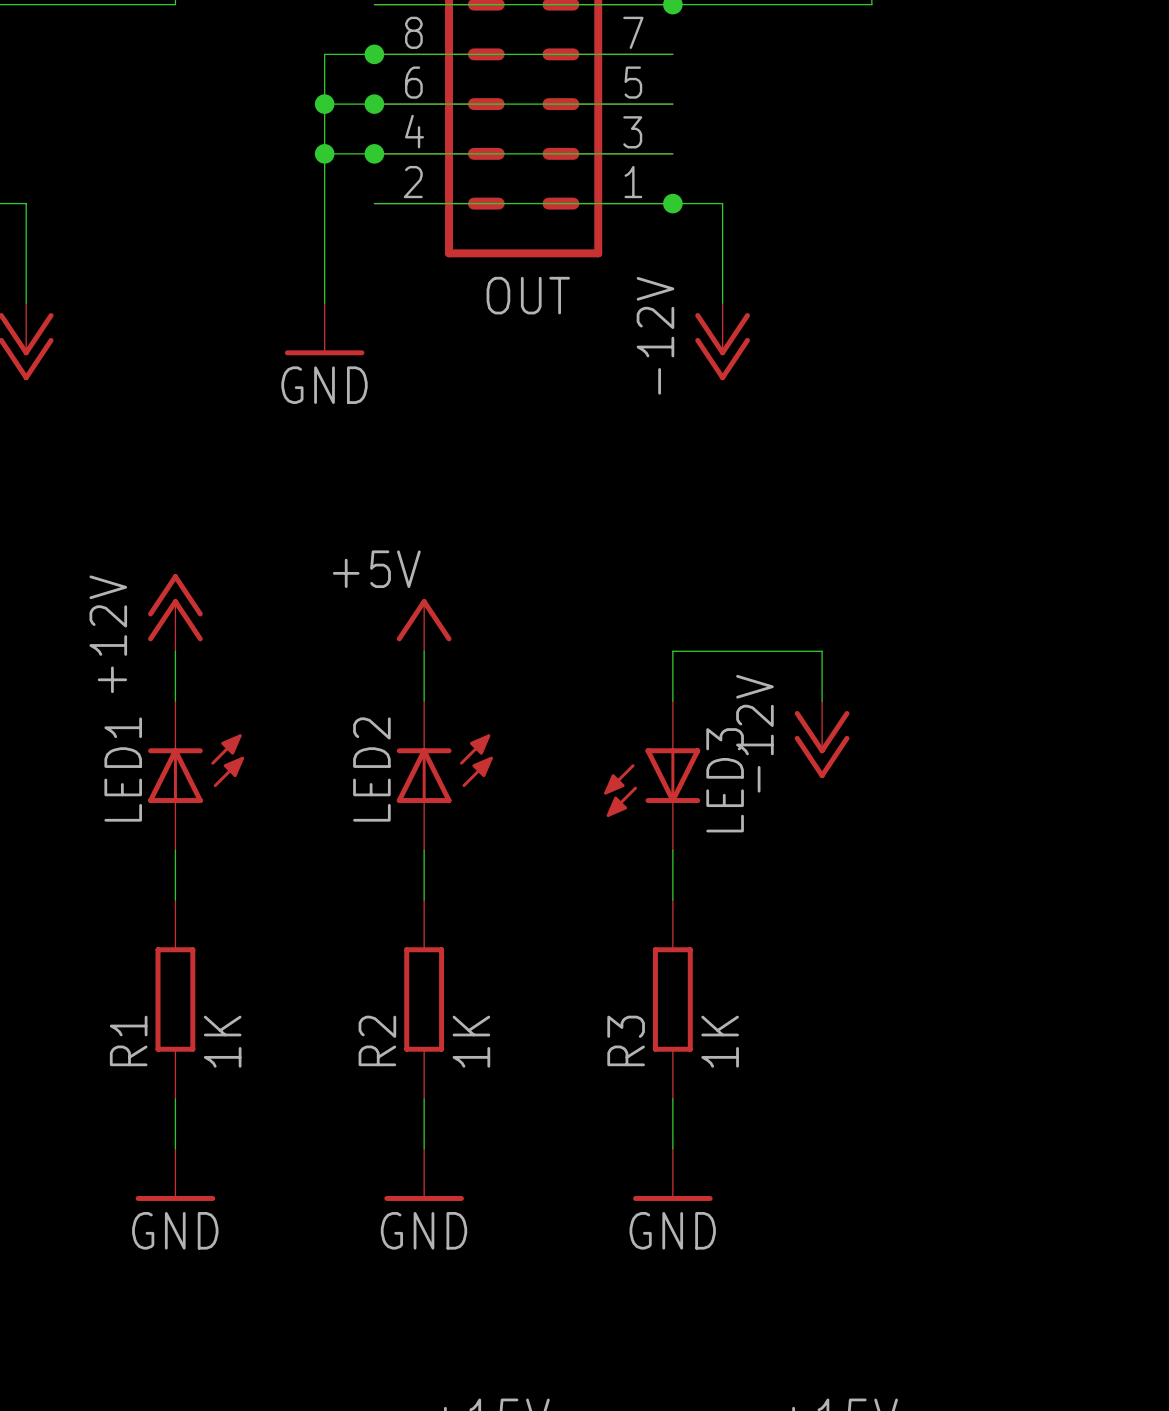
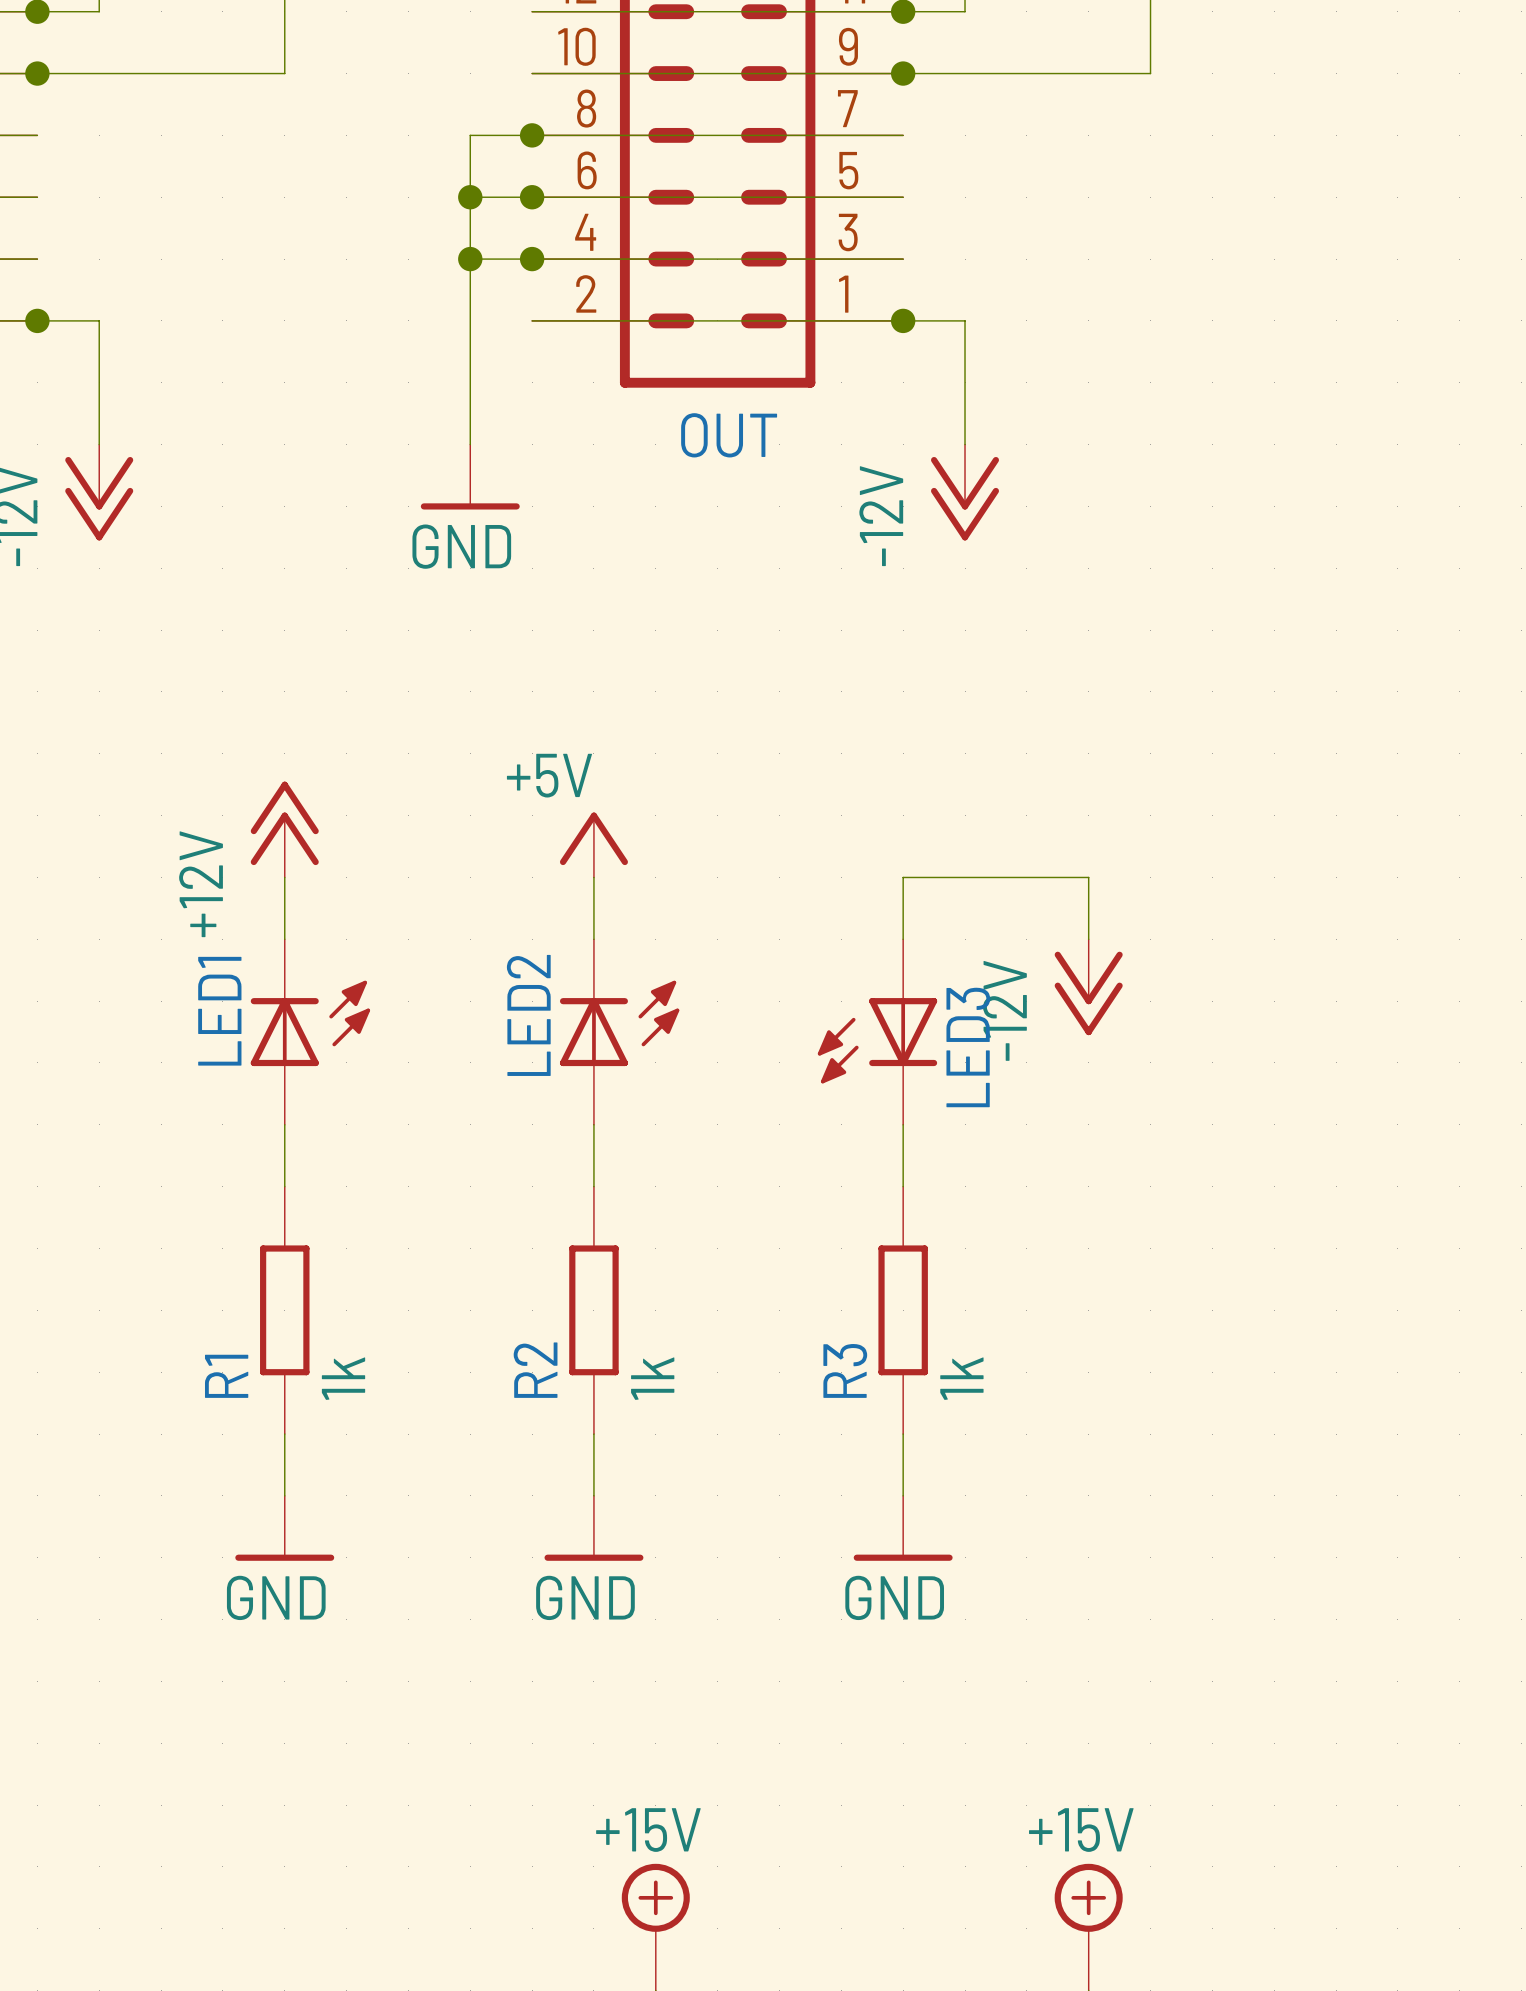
R1 value: 1K (222, 1041) -> 1k (343, 1378)
R2 value: 1K (471, 1041) -> 1k (652, 1378)
R3 value: 1K (720, 1041) -> 1k (961, 1378)

